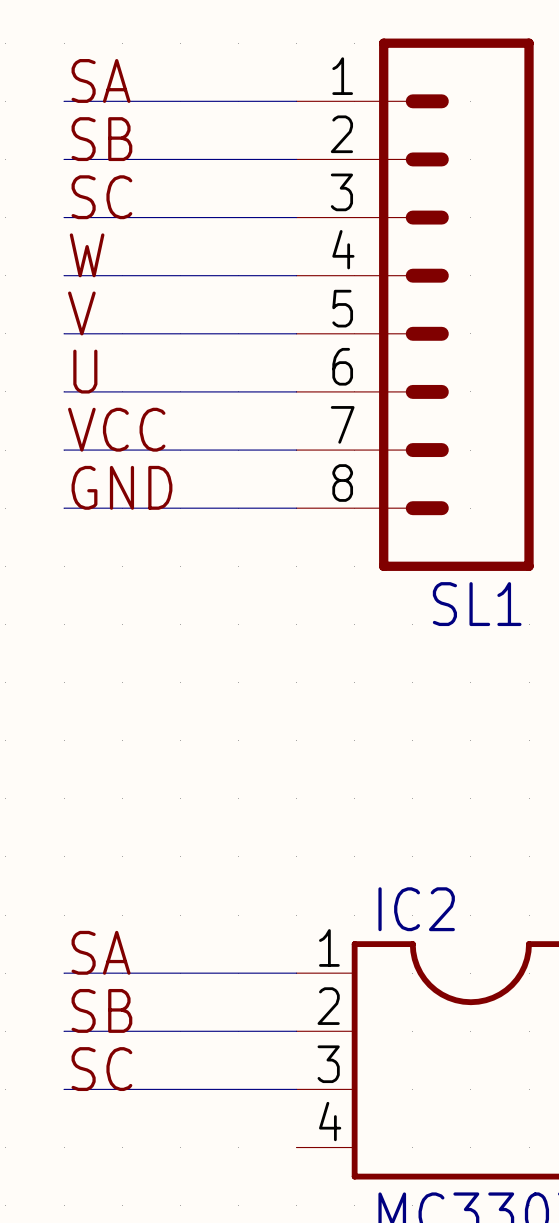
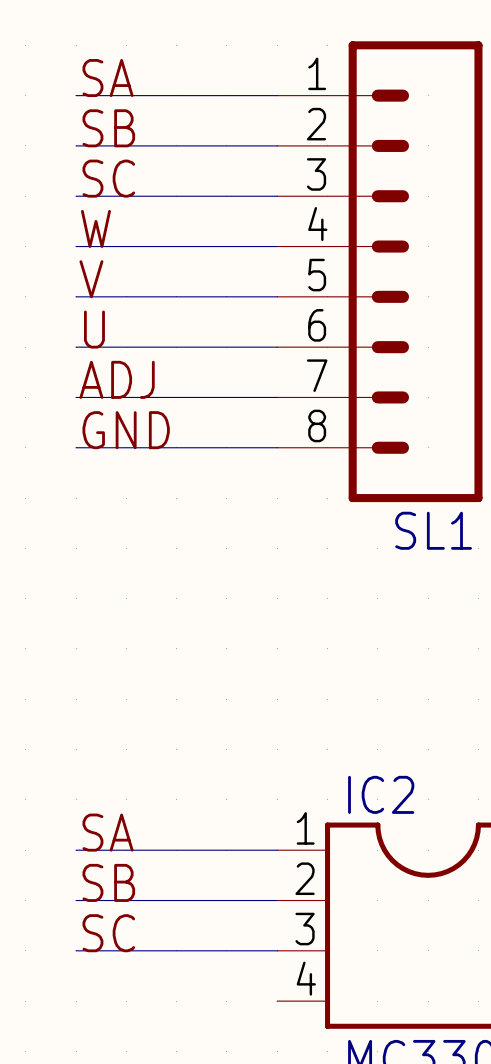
label: VCC (116, 429) -> ADJ (117, 379)

